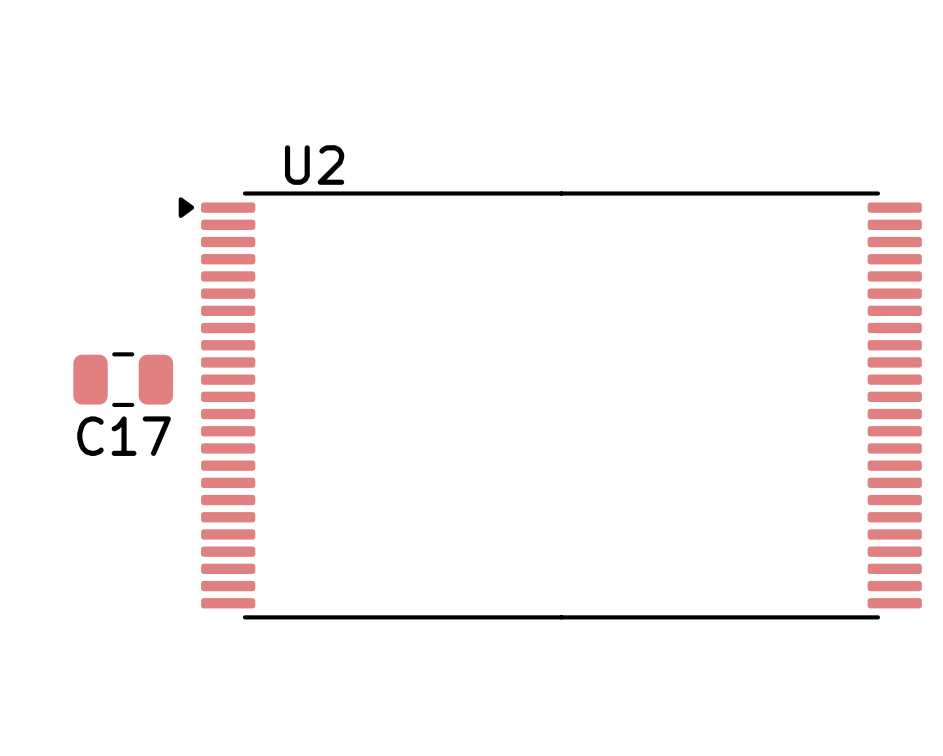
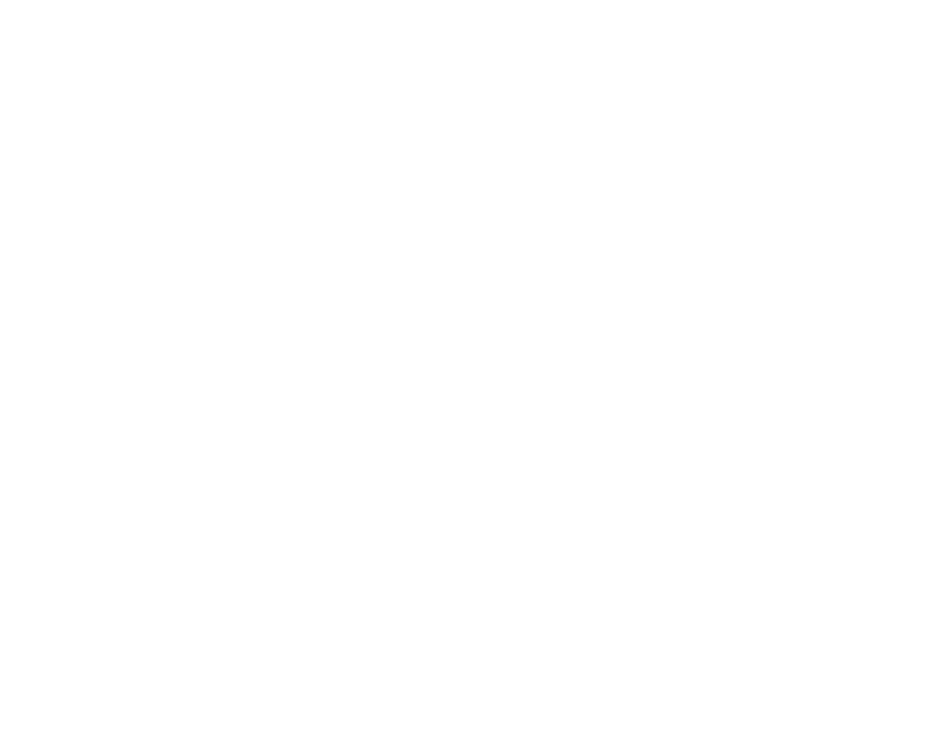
C17: (123, 379) -> none
U2: (550, 405) -> none

